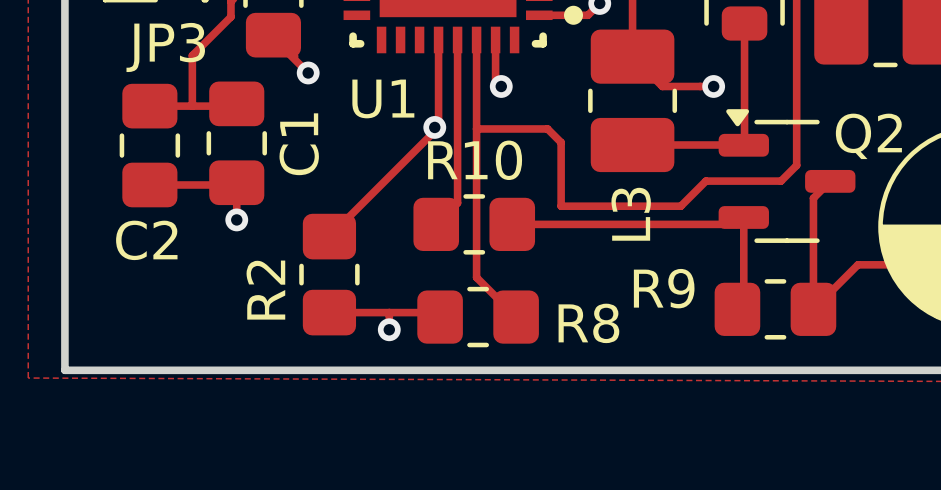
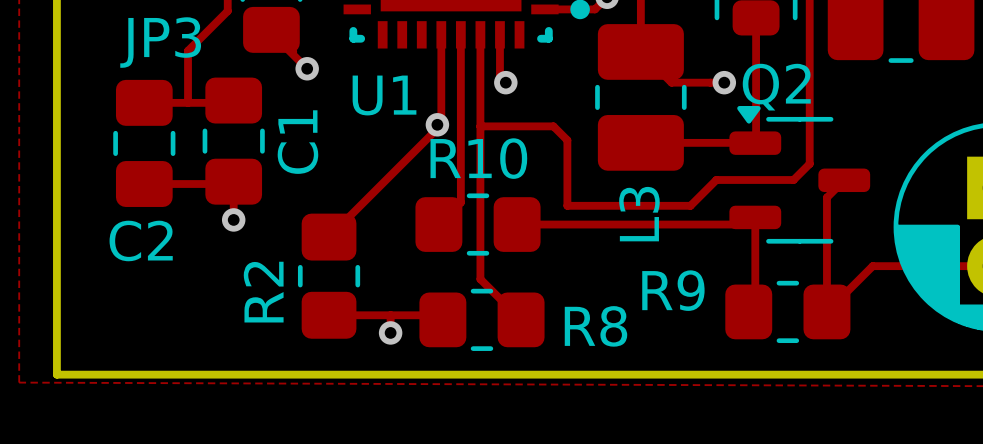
Q2 name position: Q2 (868, 136) -> Q2 (776, 87)

